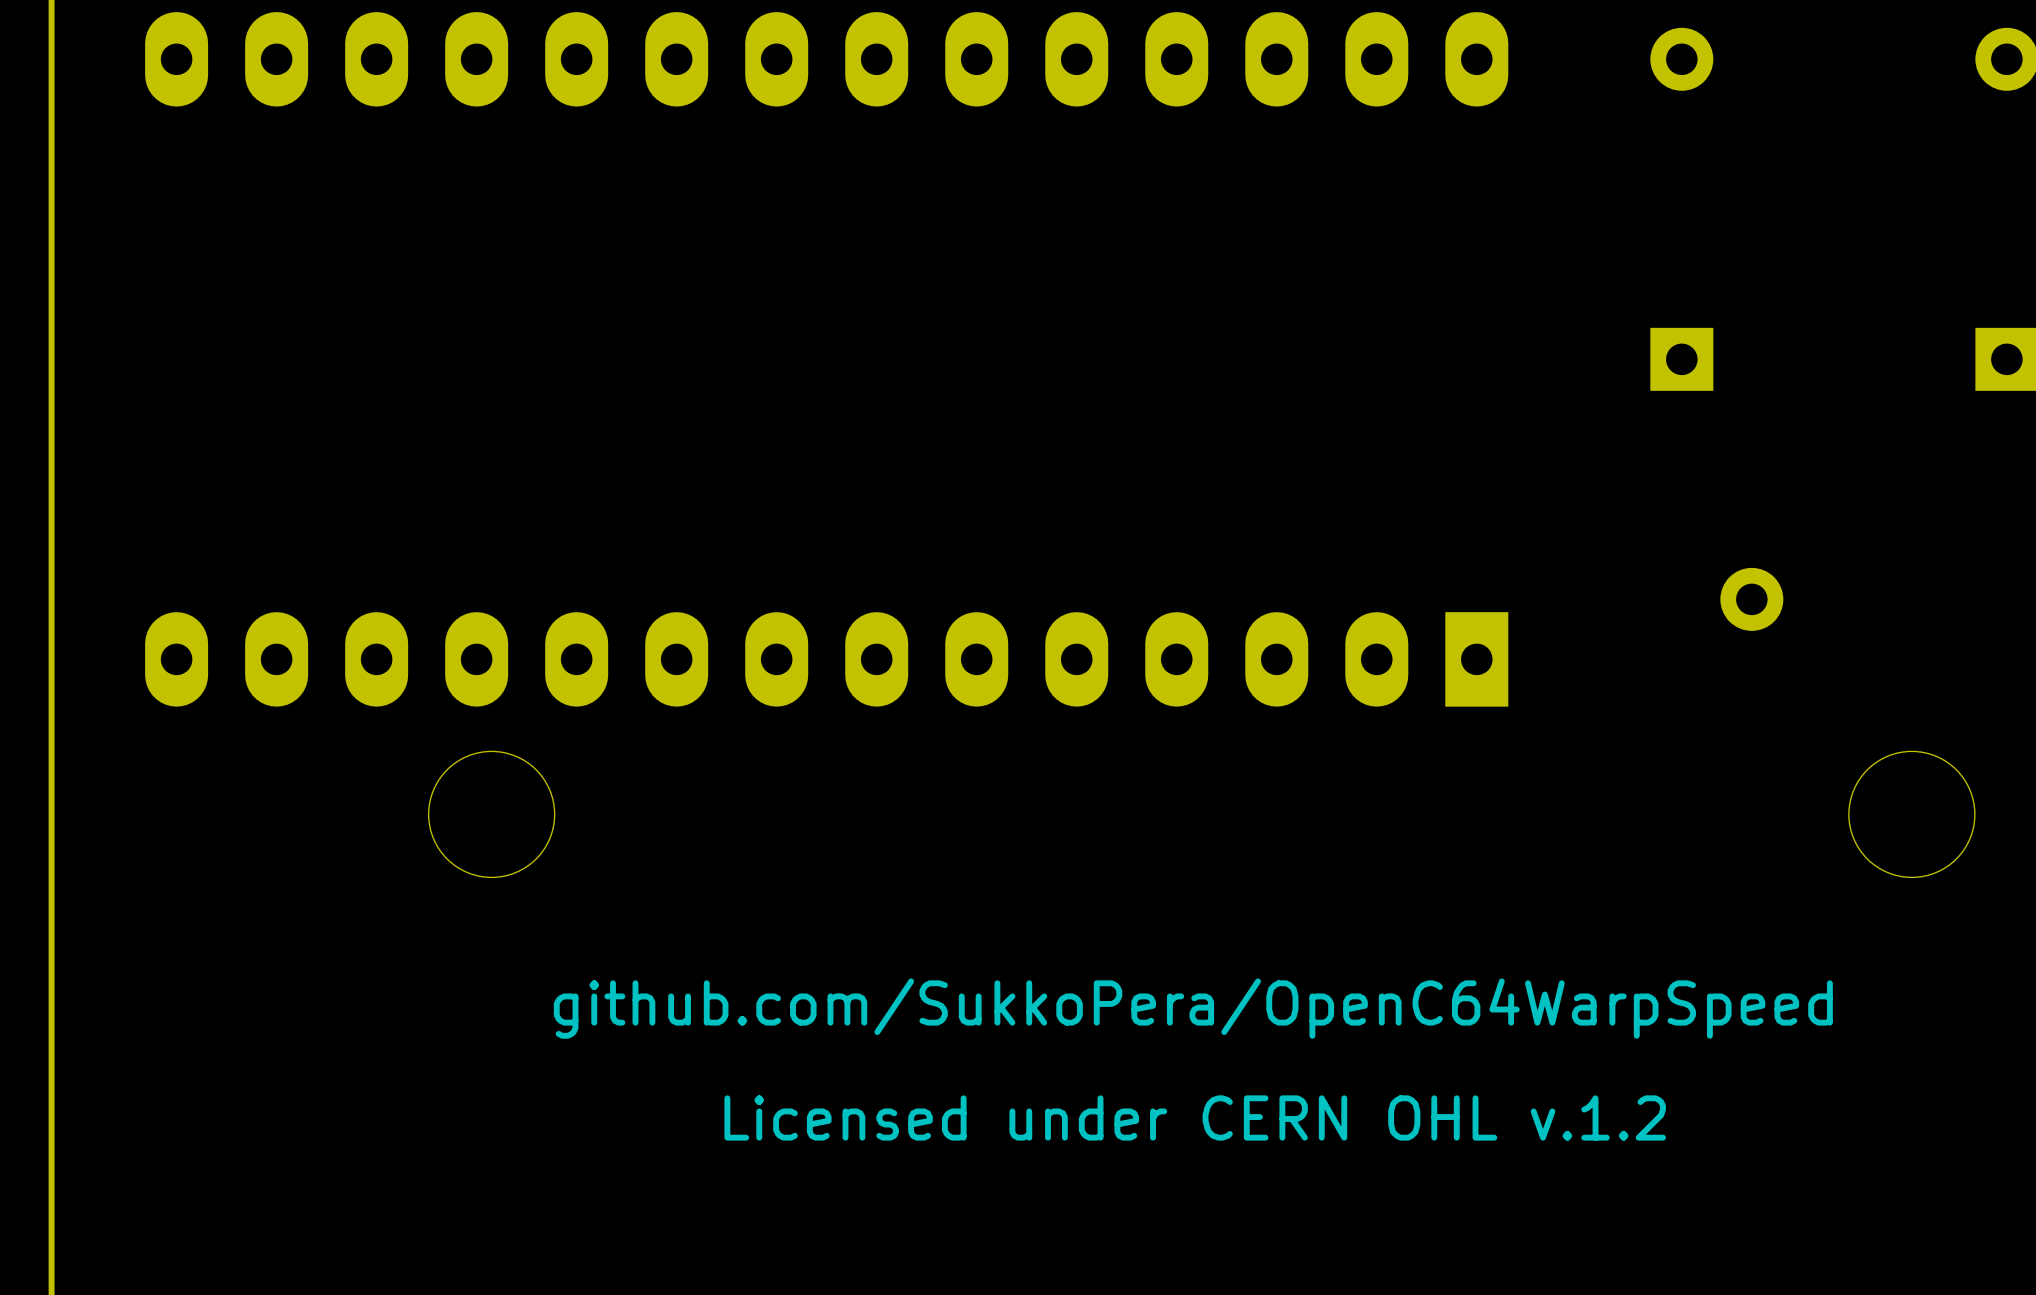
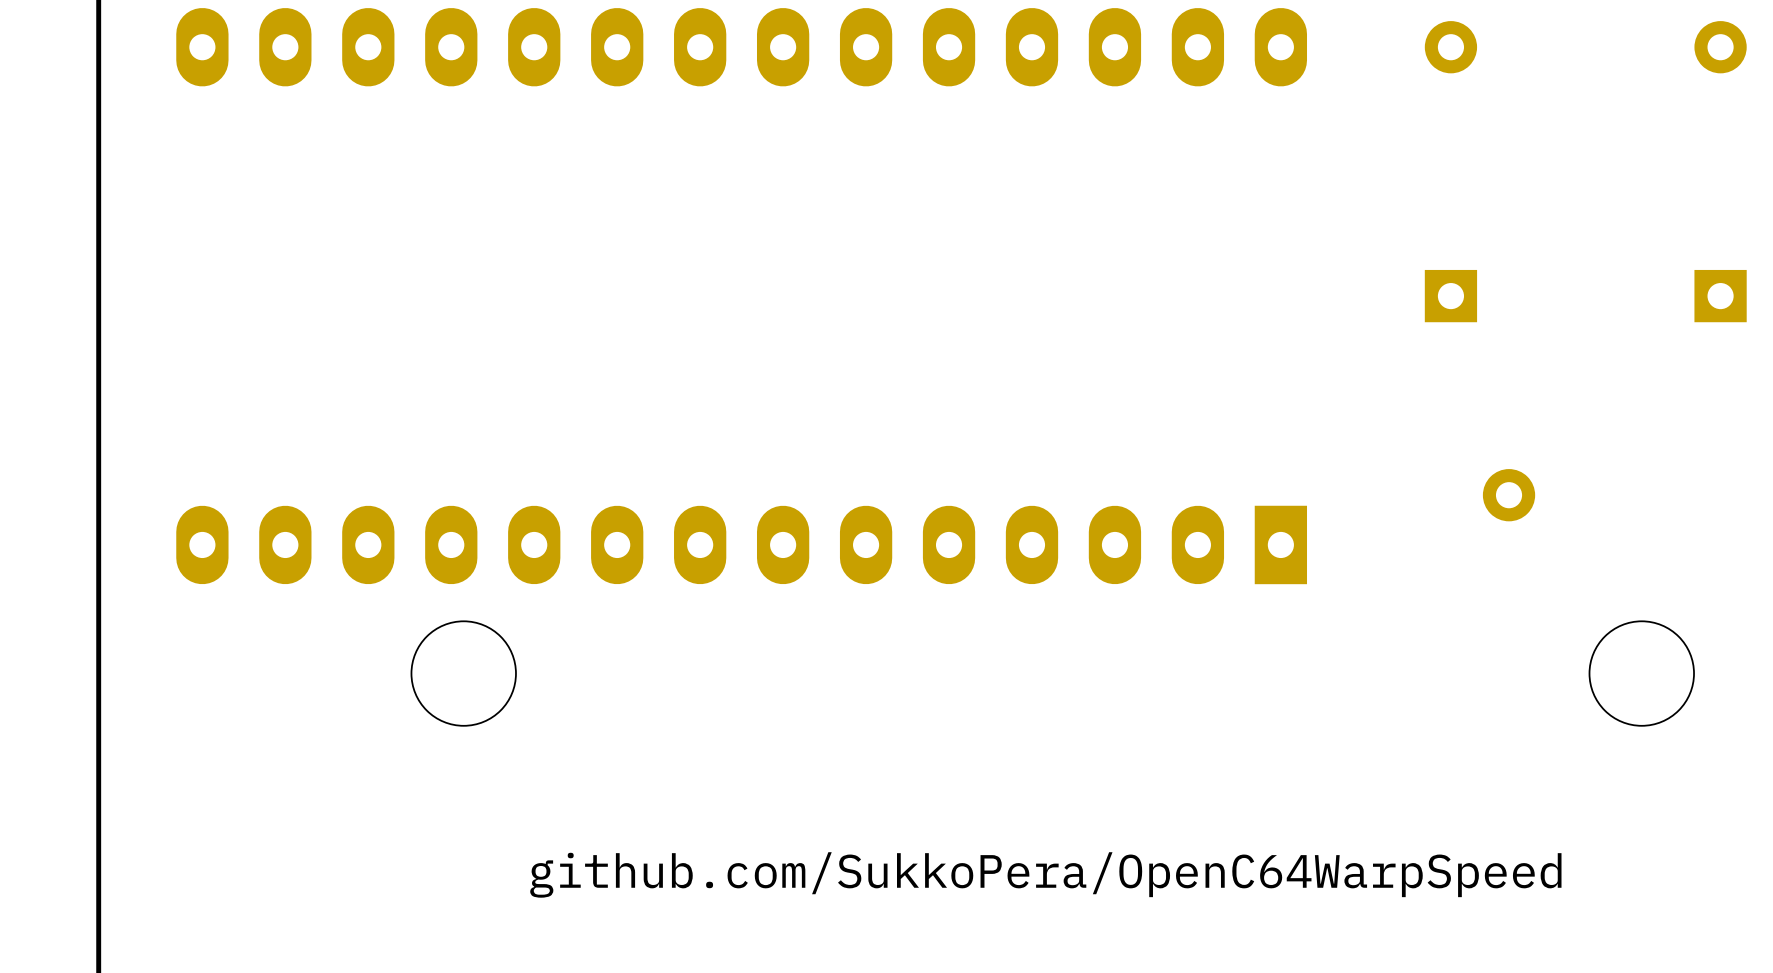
text position: github.com/SukkoPera/OpenC64WarpSpeed (1193, 1008) -> github.com/SukkoPera/OpenC64WarpSpeed (1045, 874)
text: Licensed under CERN OHL v.1.2 (1195, 1117) -> none

